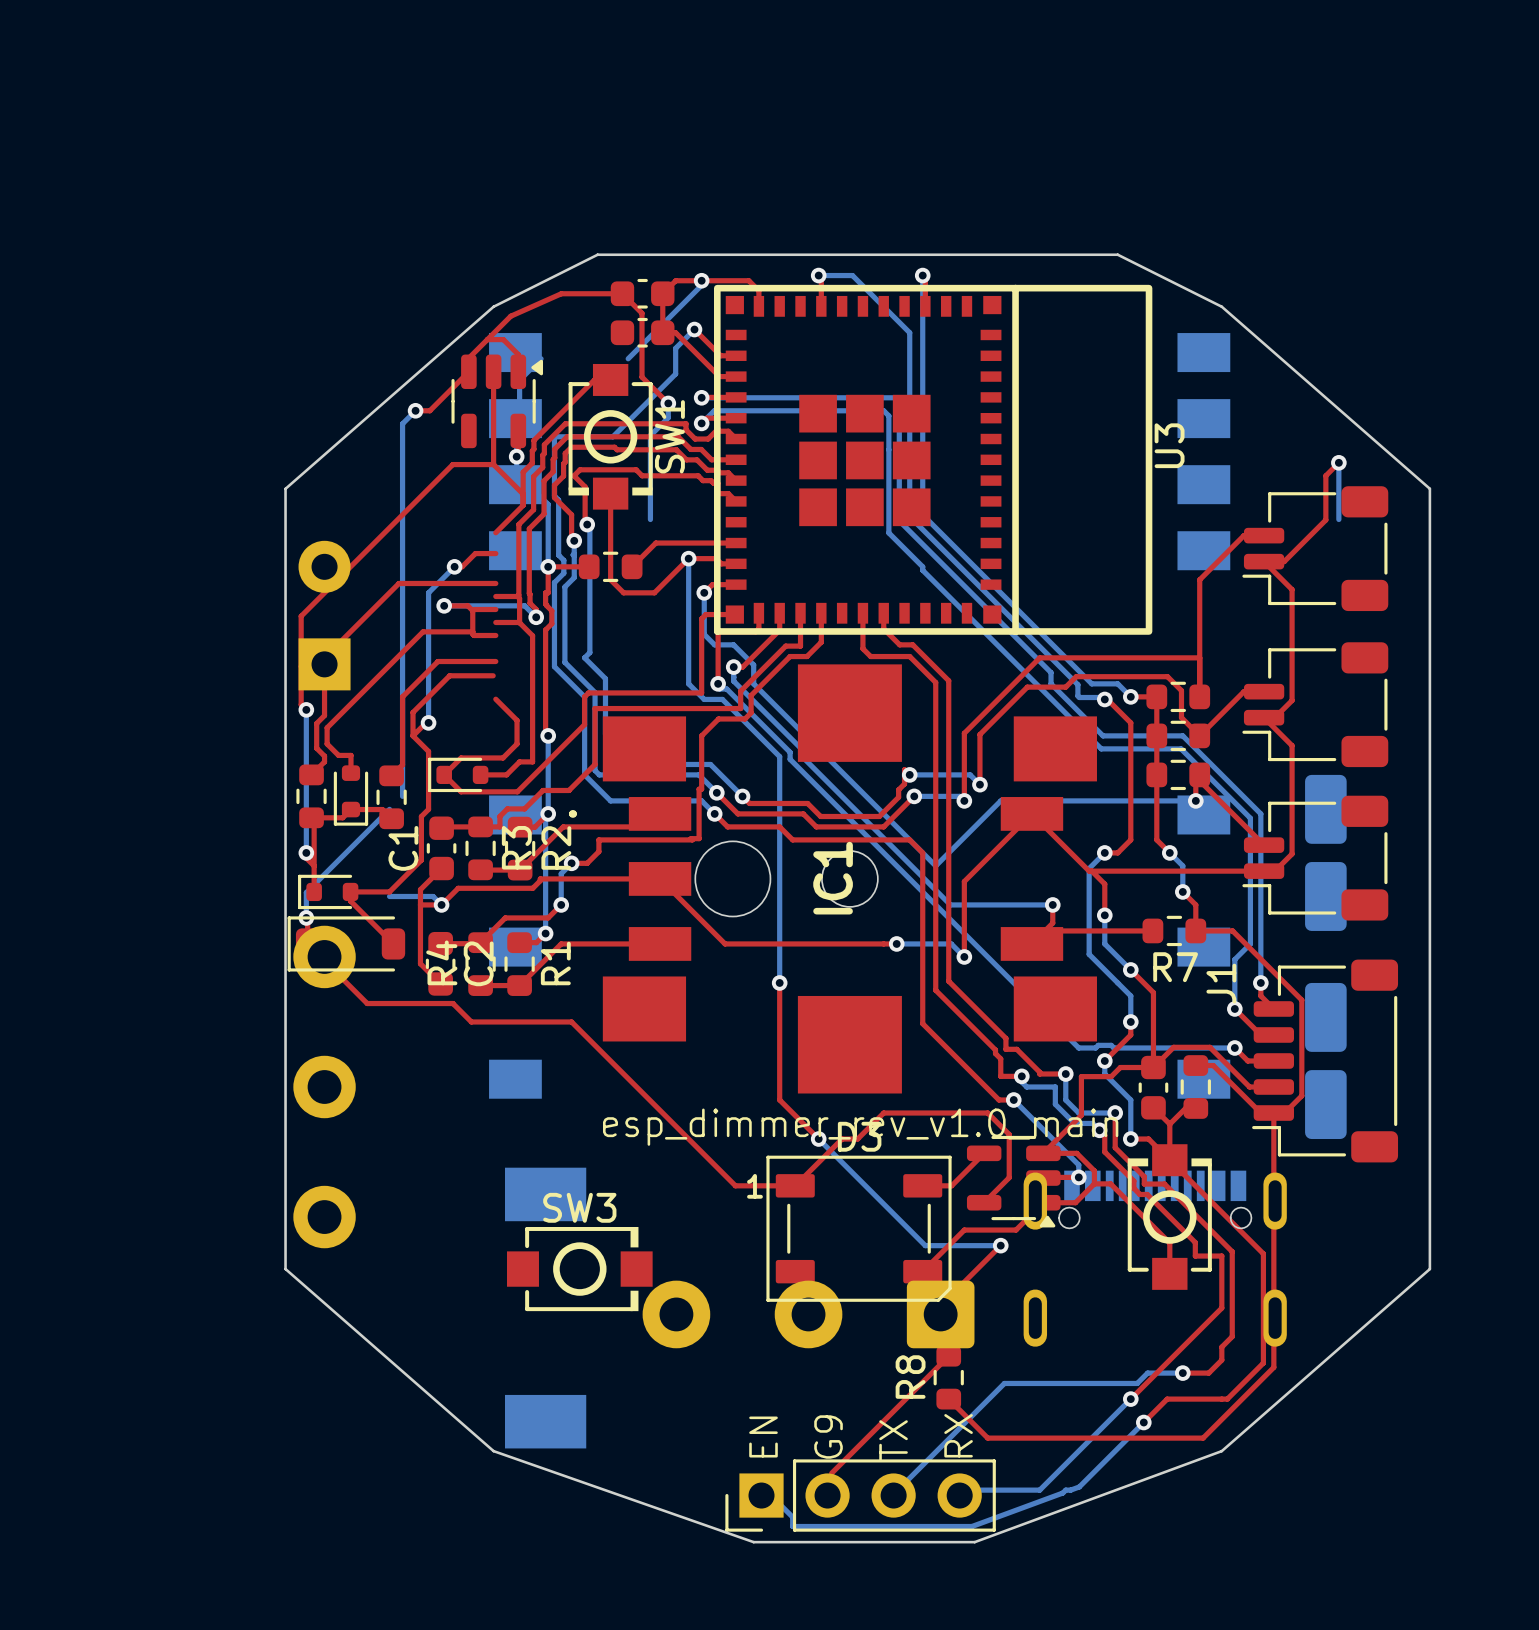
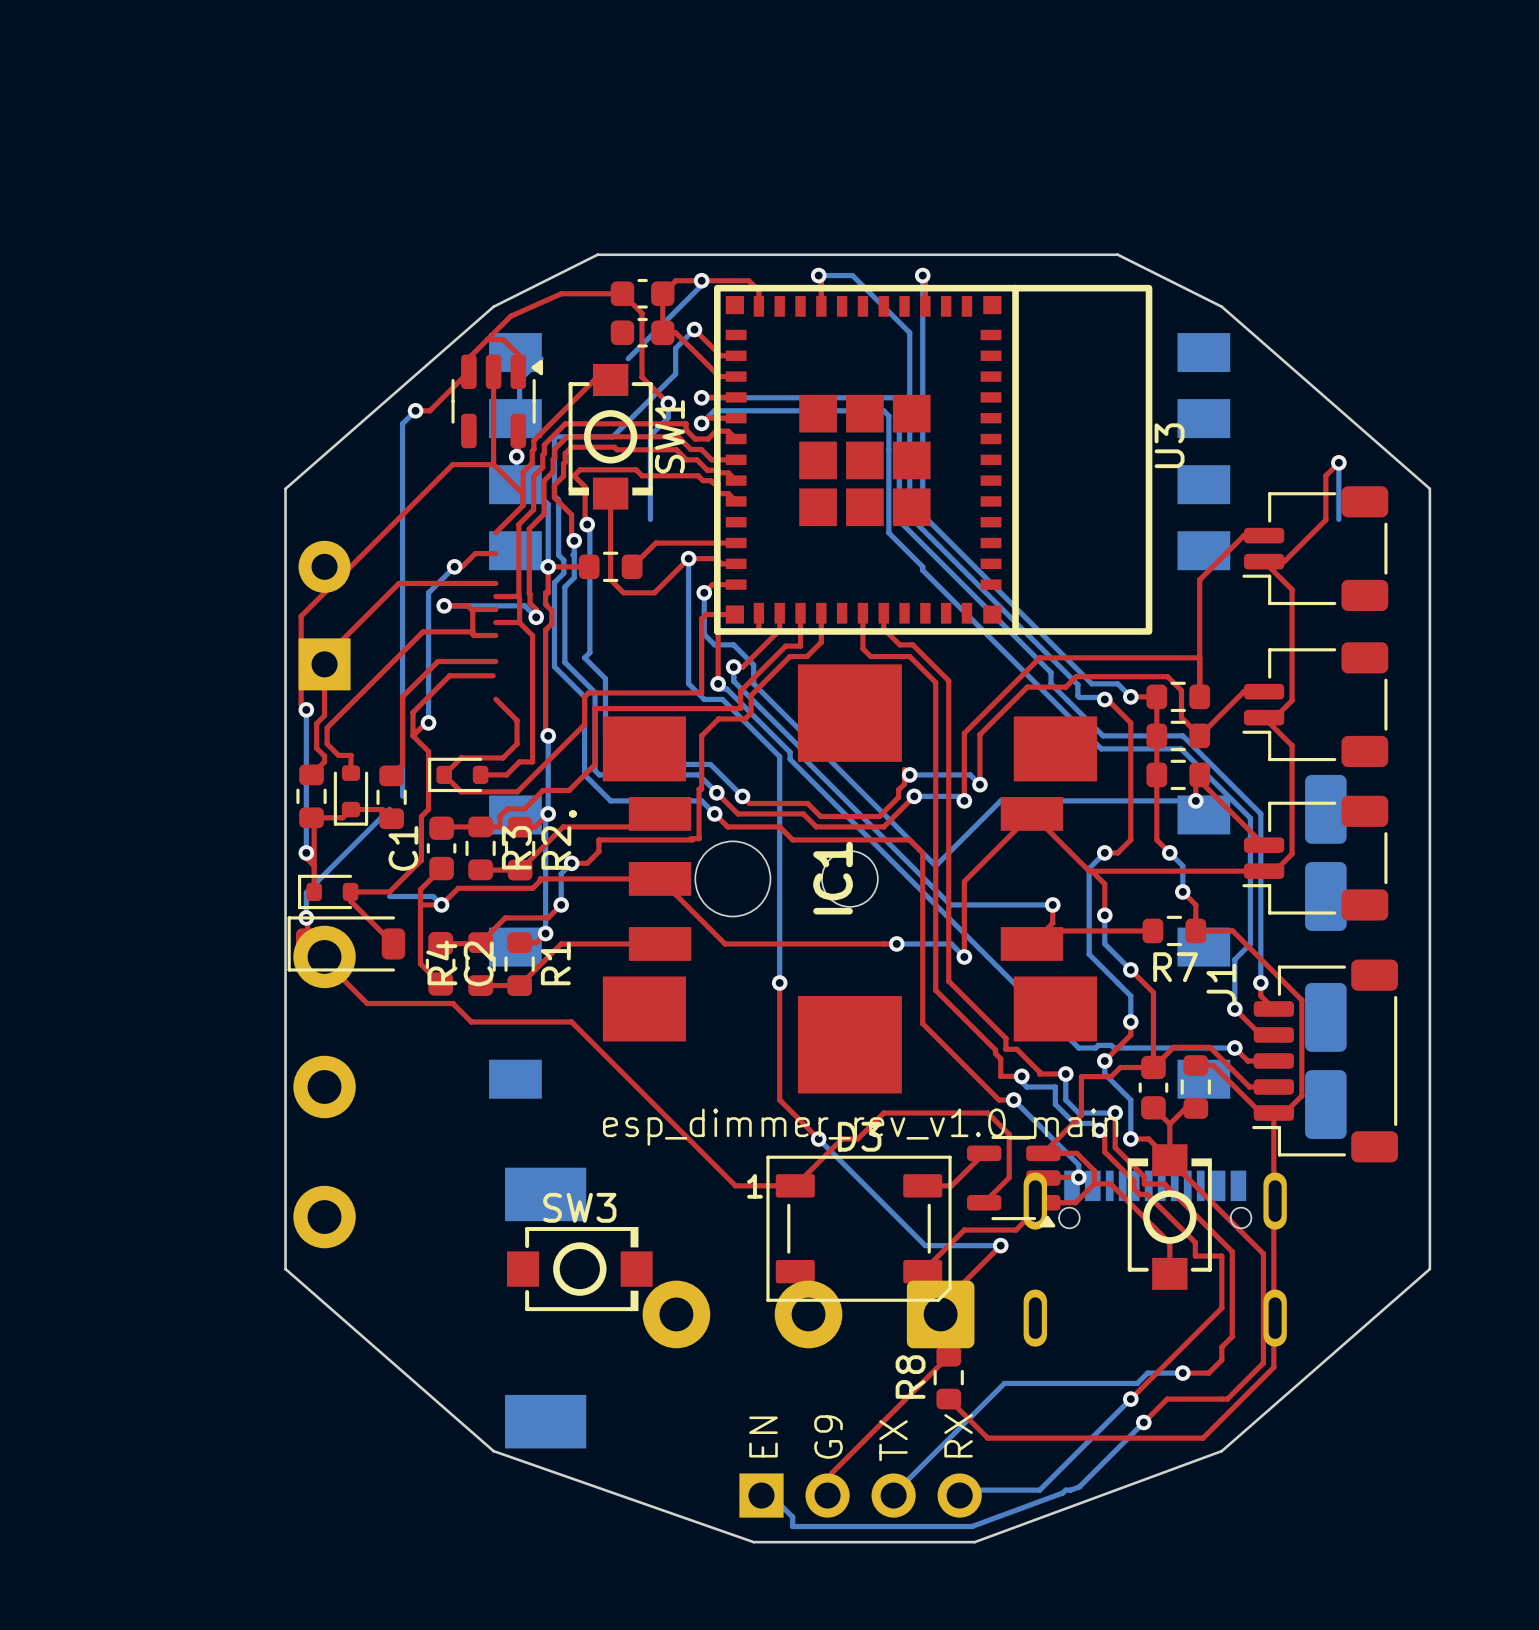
part side: top (860, 1495) -> bottom (860, 1495)

